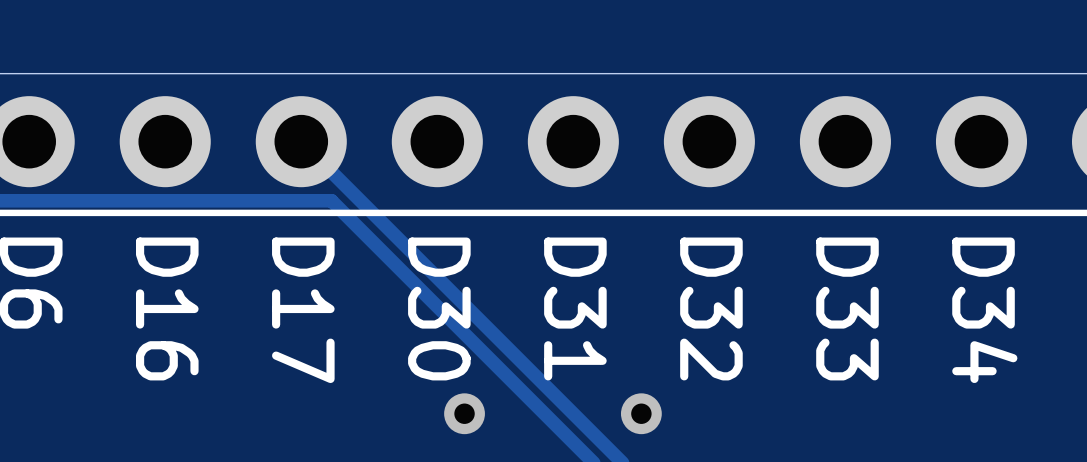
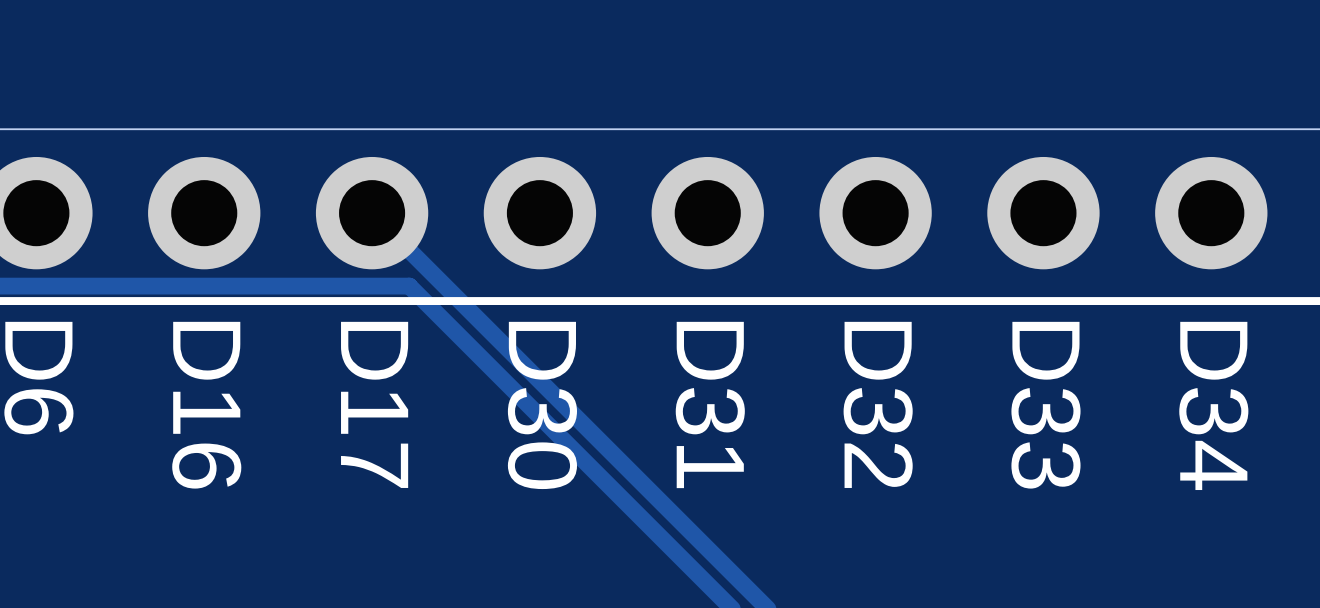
via: (464, 413) -> none
via: (641, 413) -> none

